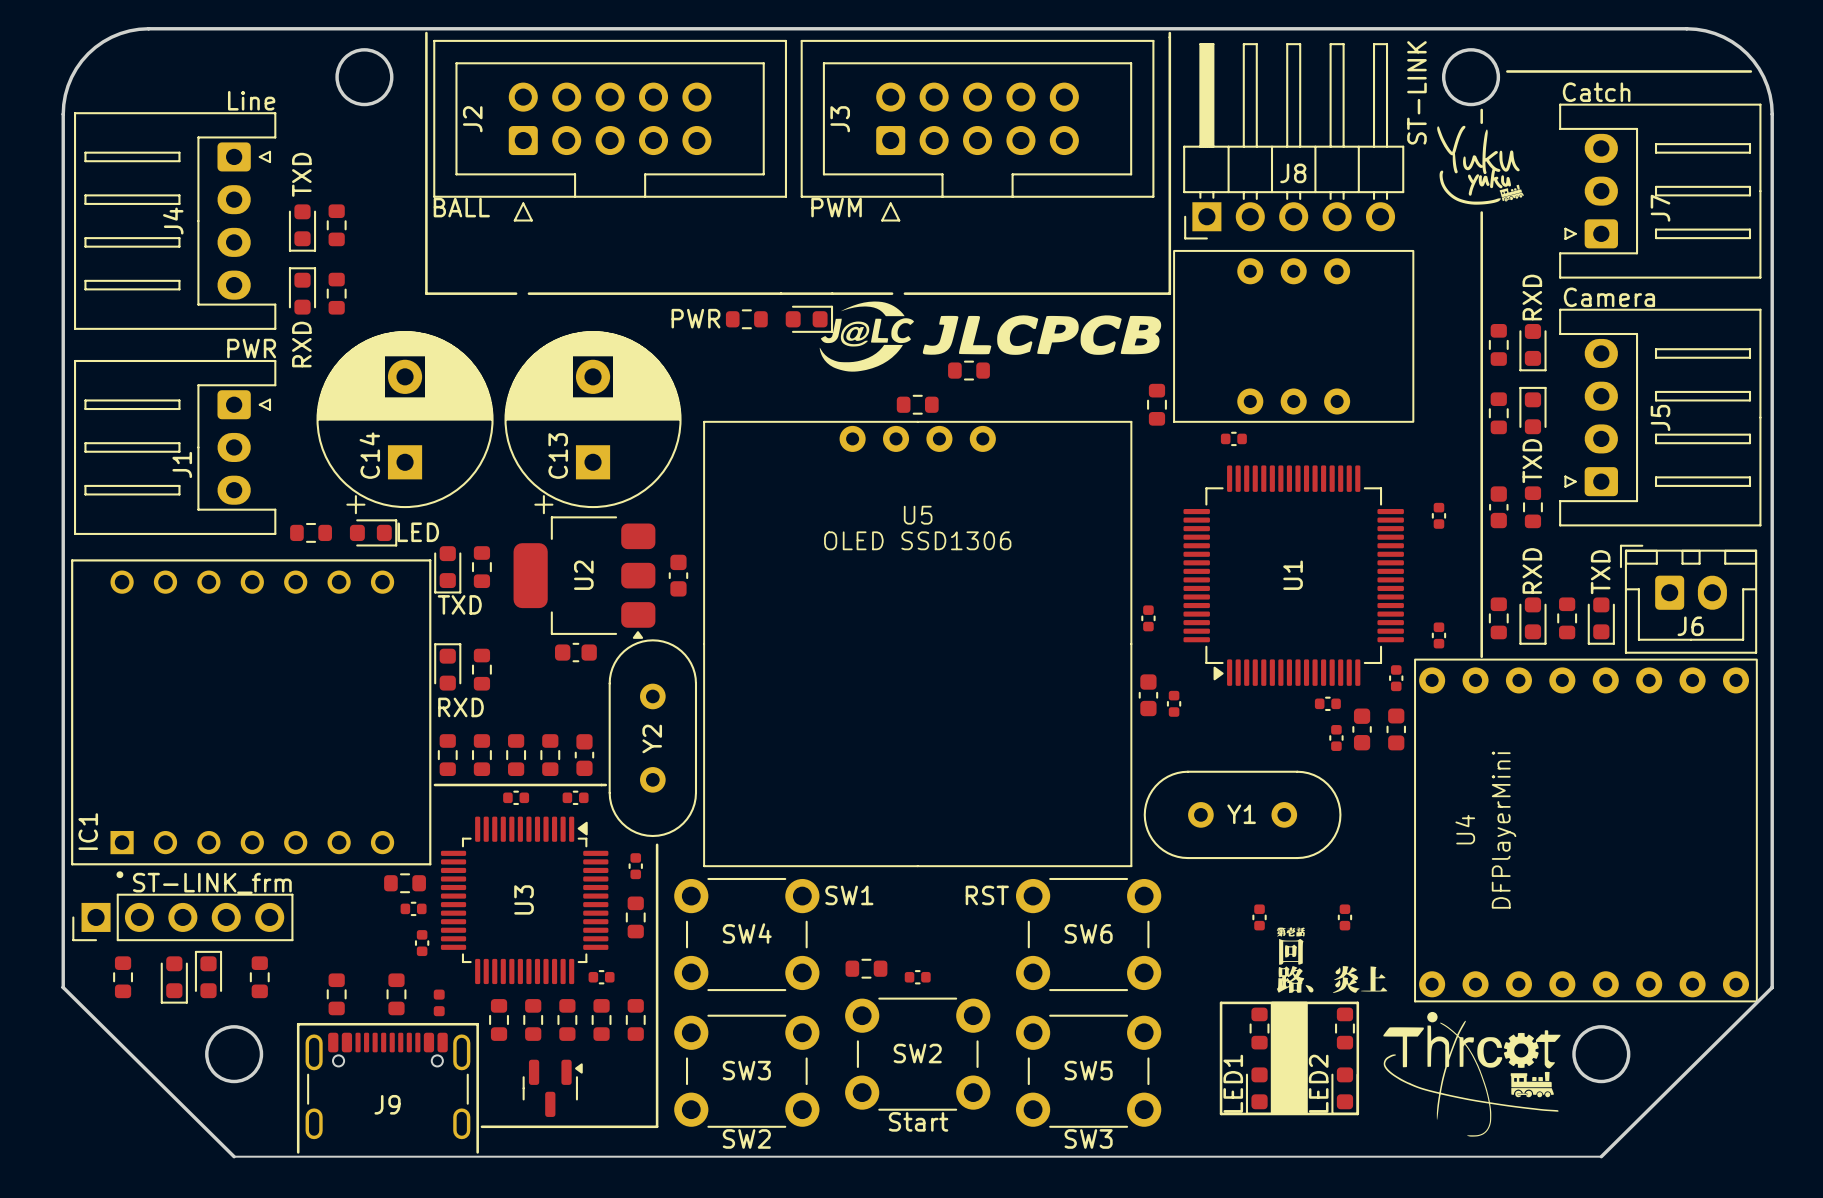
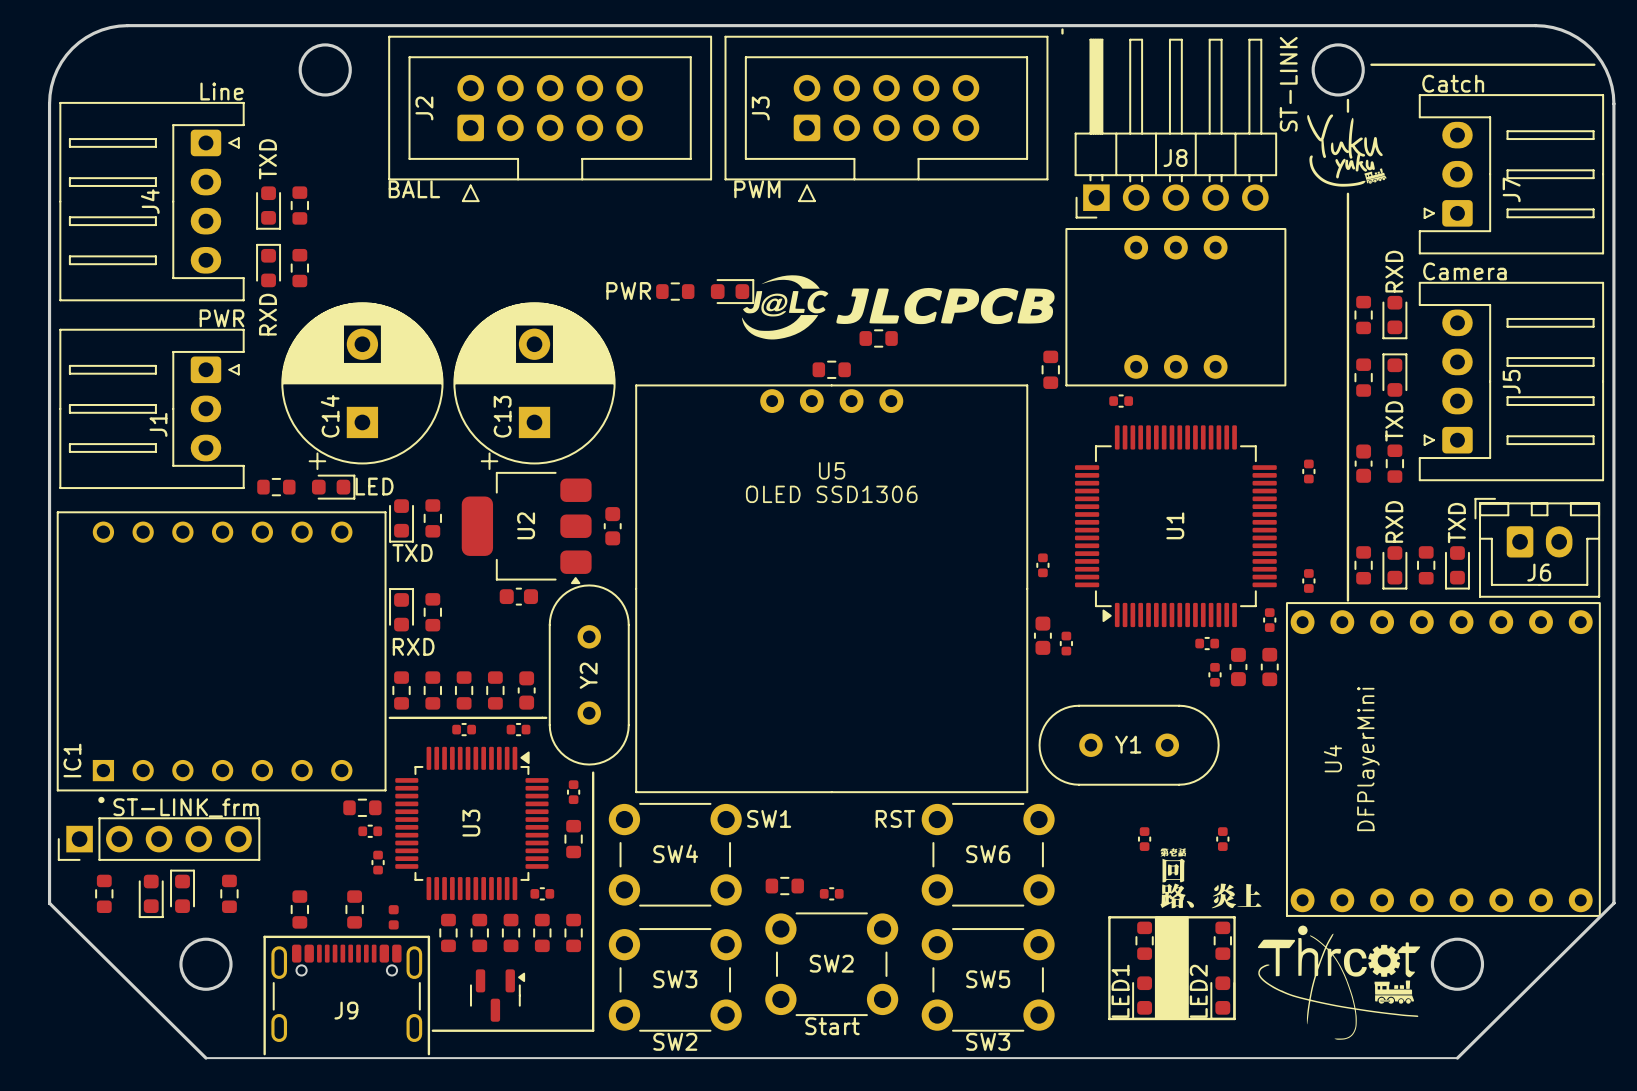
line: (426, 33) (426, 293) (516, 293) -> none
line: (1169, 37) (1169, 293) (904, 293) -> none
line: (528, 293) (892, 293) -> none

